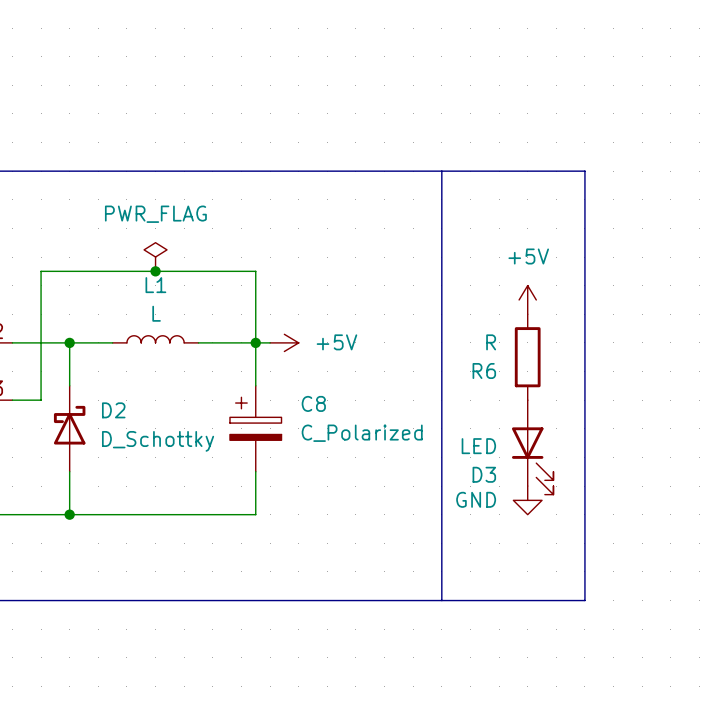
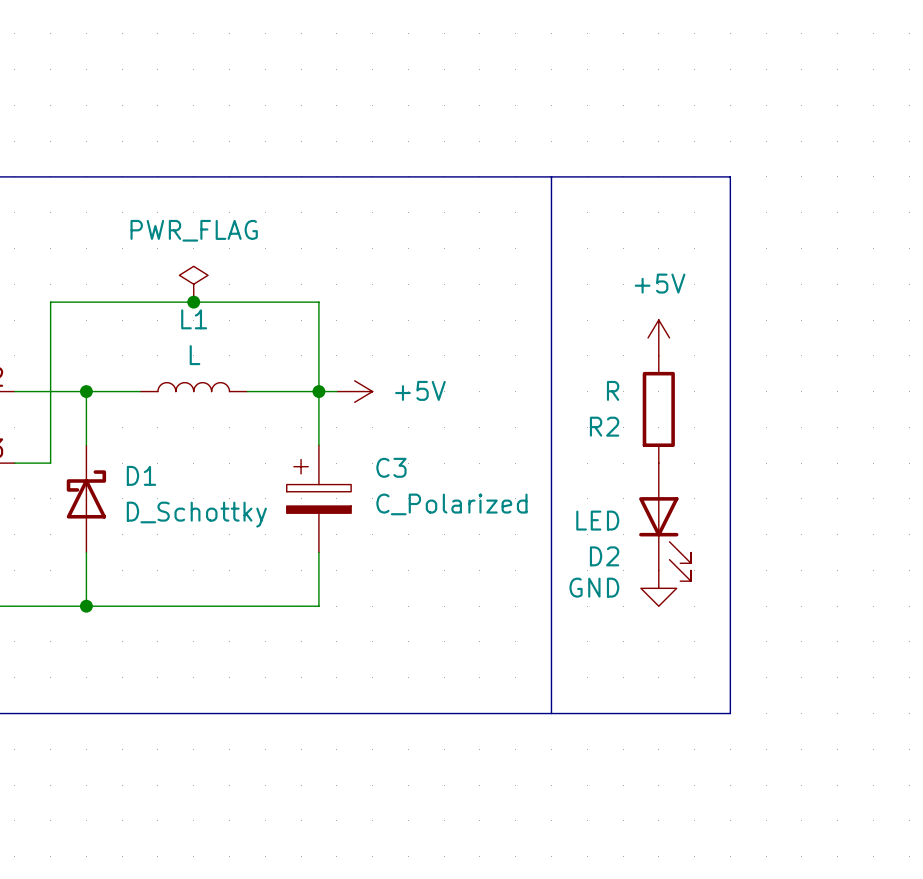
R6 name: R6 (484, 371) -> R2 (604, 426)
C8 name: C8 (313, 403) -> C3 (391, 467)
D2 name: D2 (113, 410) -> D1 (141, 475)
D3 name: D3 (484, 474) -> D2 (604, 556)

